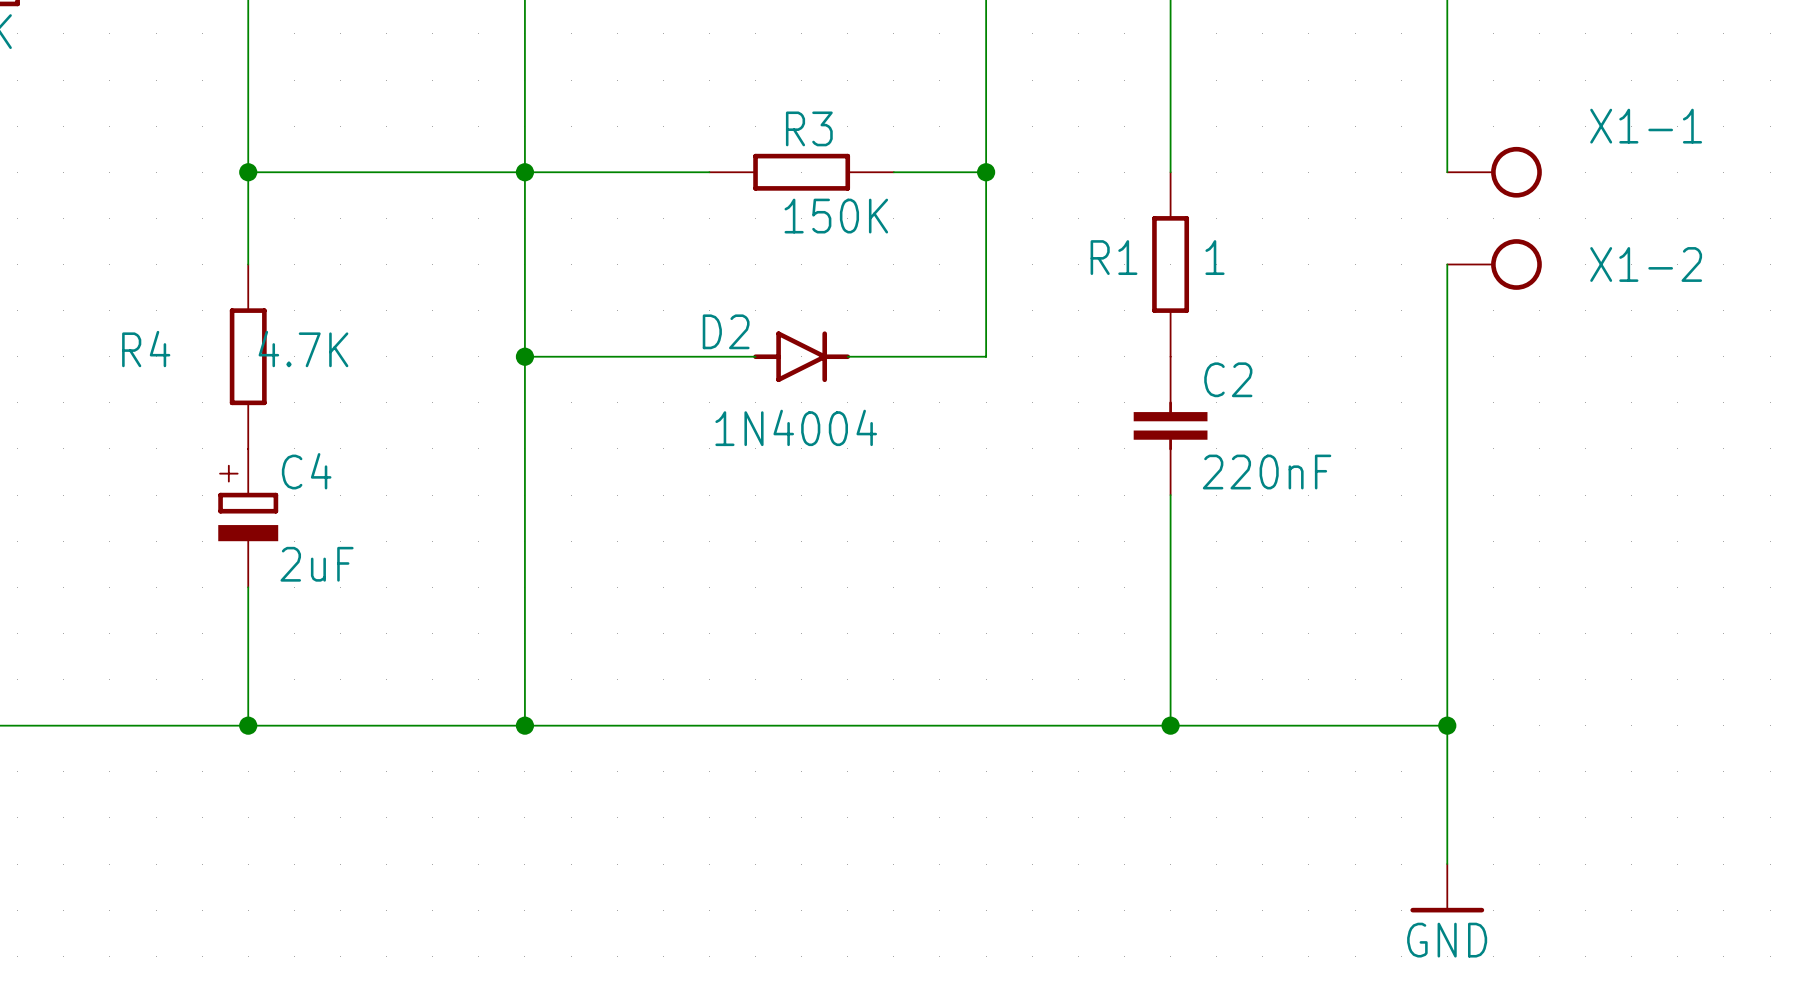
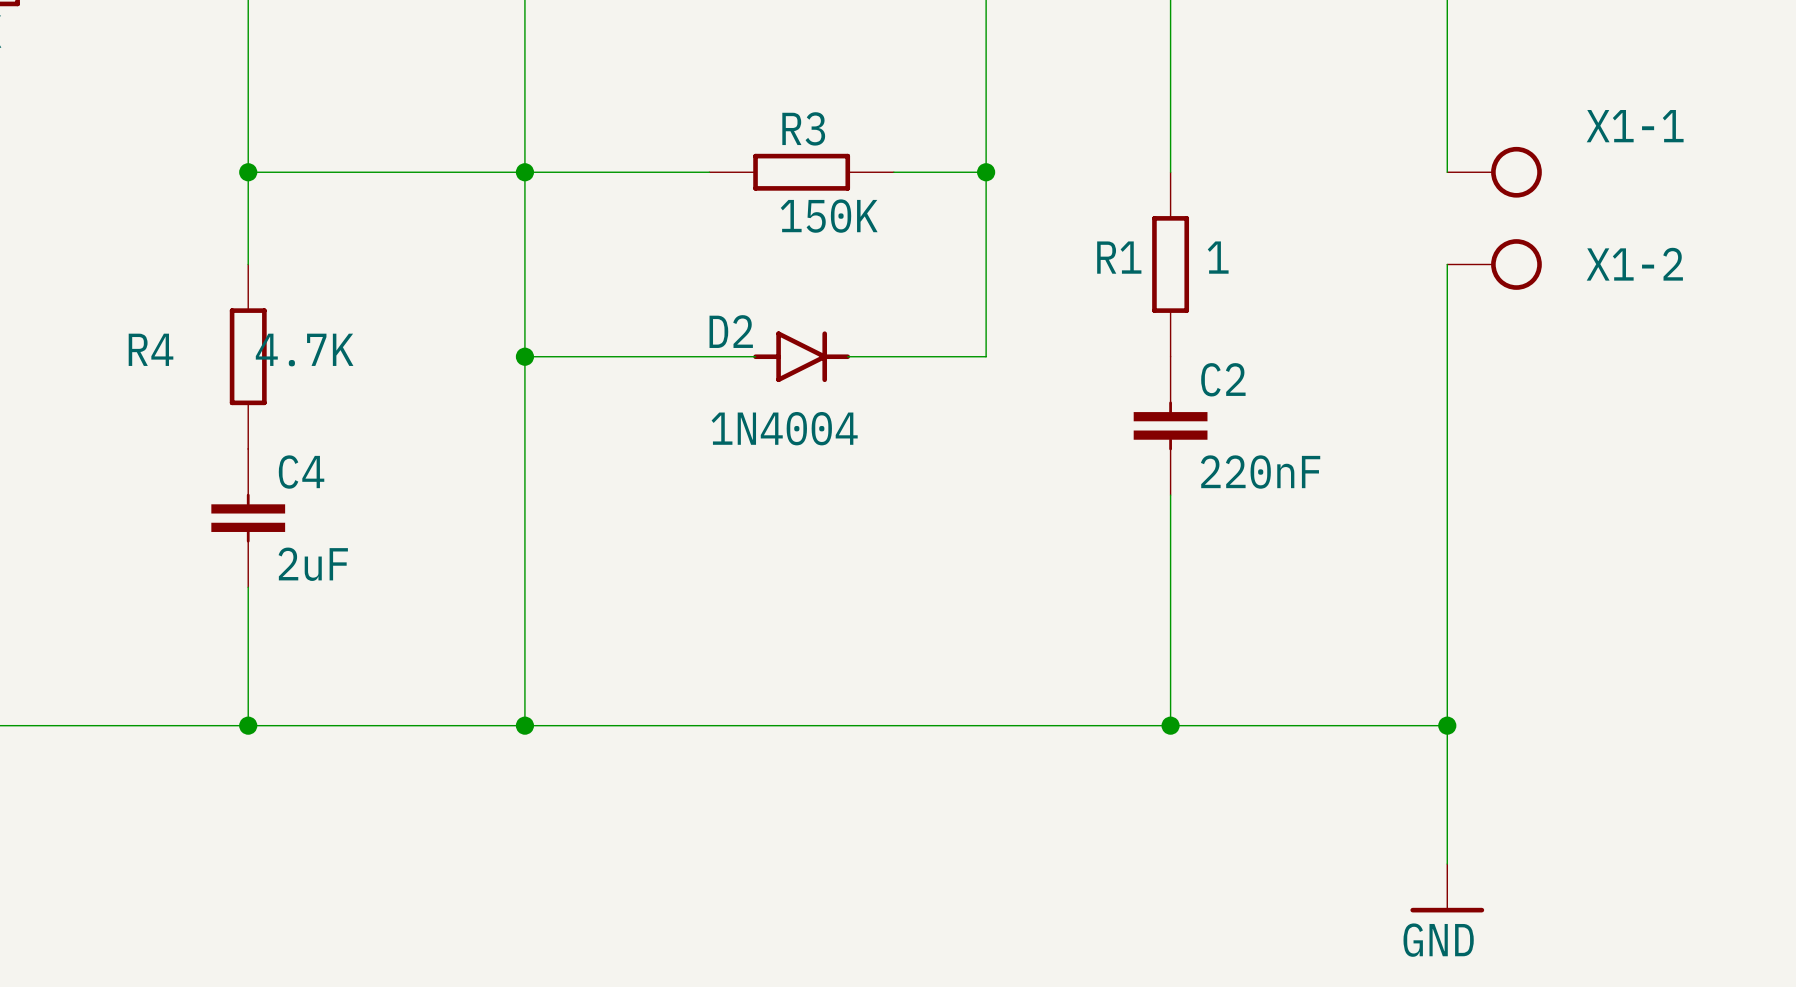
C4 symbol: [218, 448, 279, 588] -> [211, 448, 286, 588]

